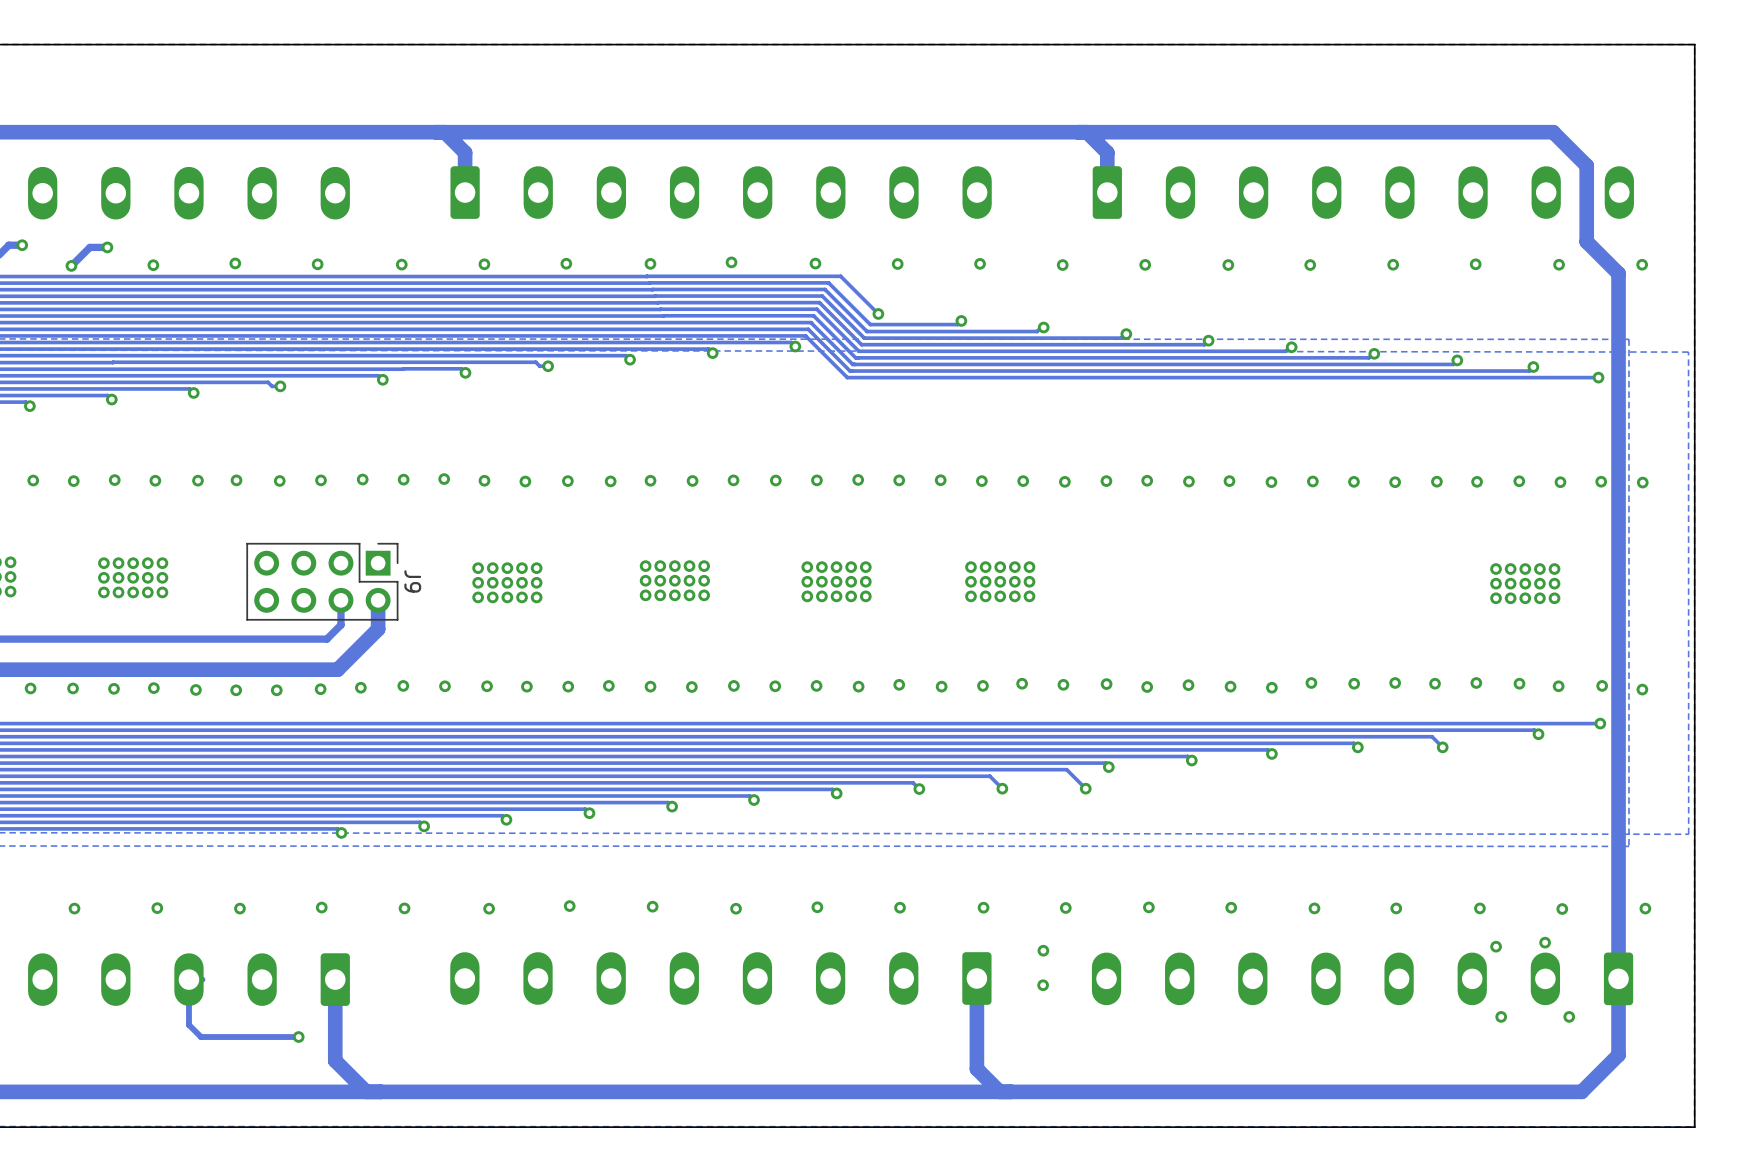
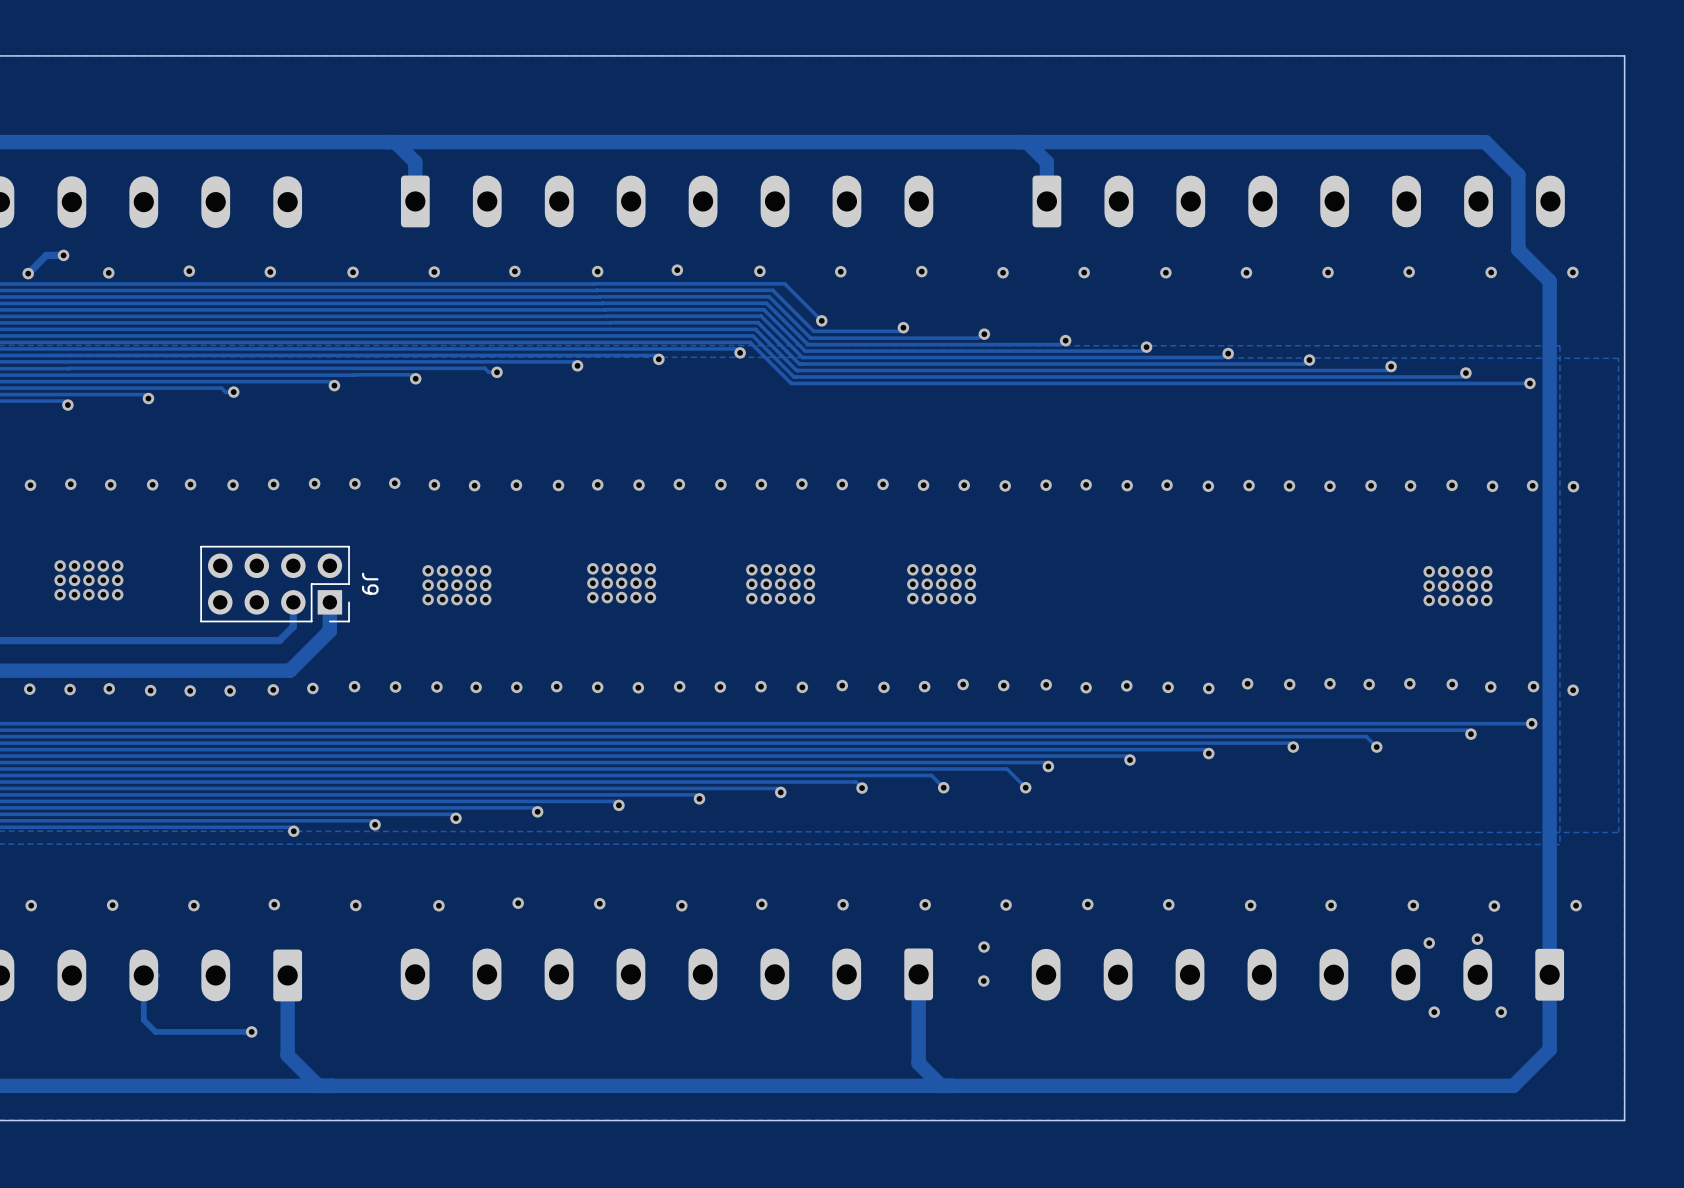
J9 footprint: [246, 542, 399, 621] -> [200, 545, 350, 623]

